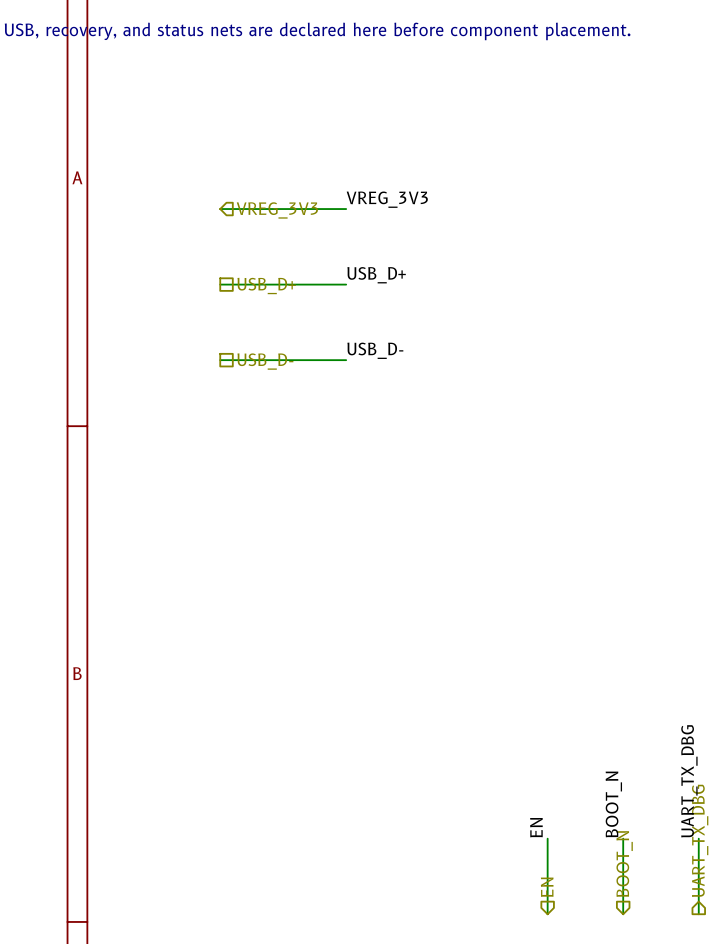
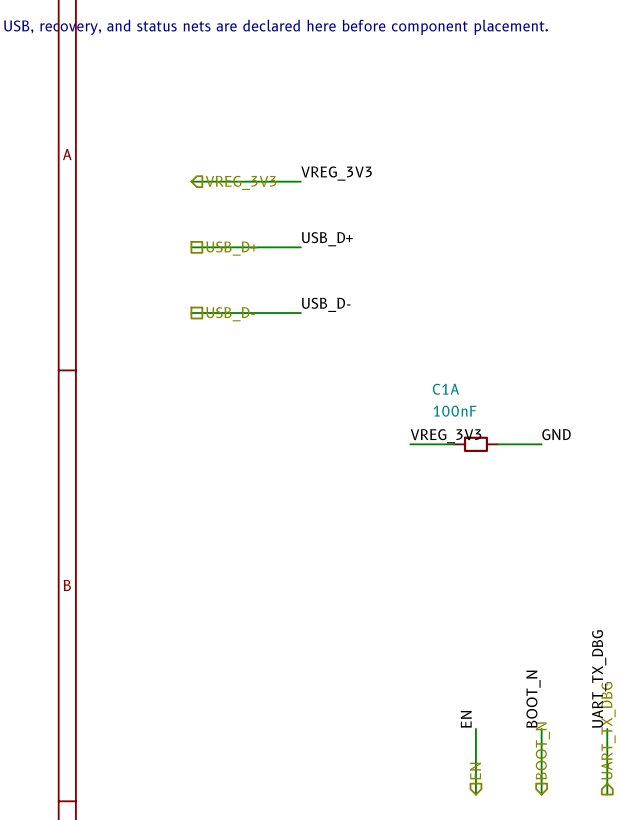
label: none -> GND (556, 434)
label: none -> VREG_3V3 (446, 436)
wire: none -> (410, 444) (454, 444)
C1A: none -> 100nF (475, 444)
wire: none -> (497, 444) (541, 444)

